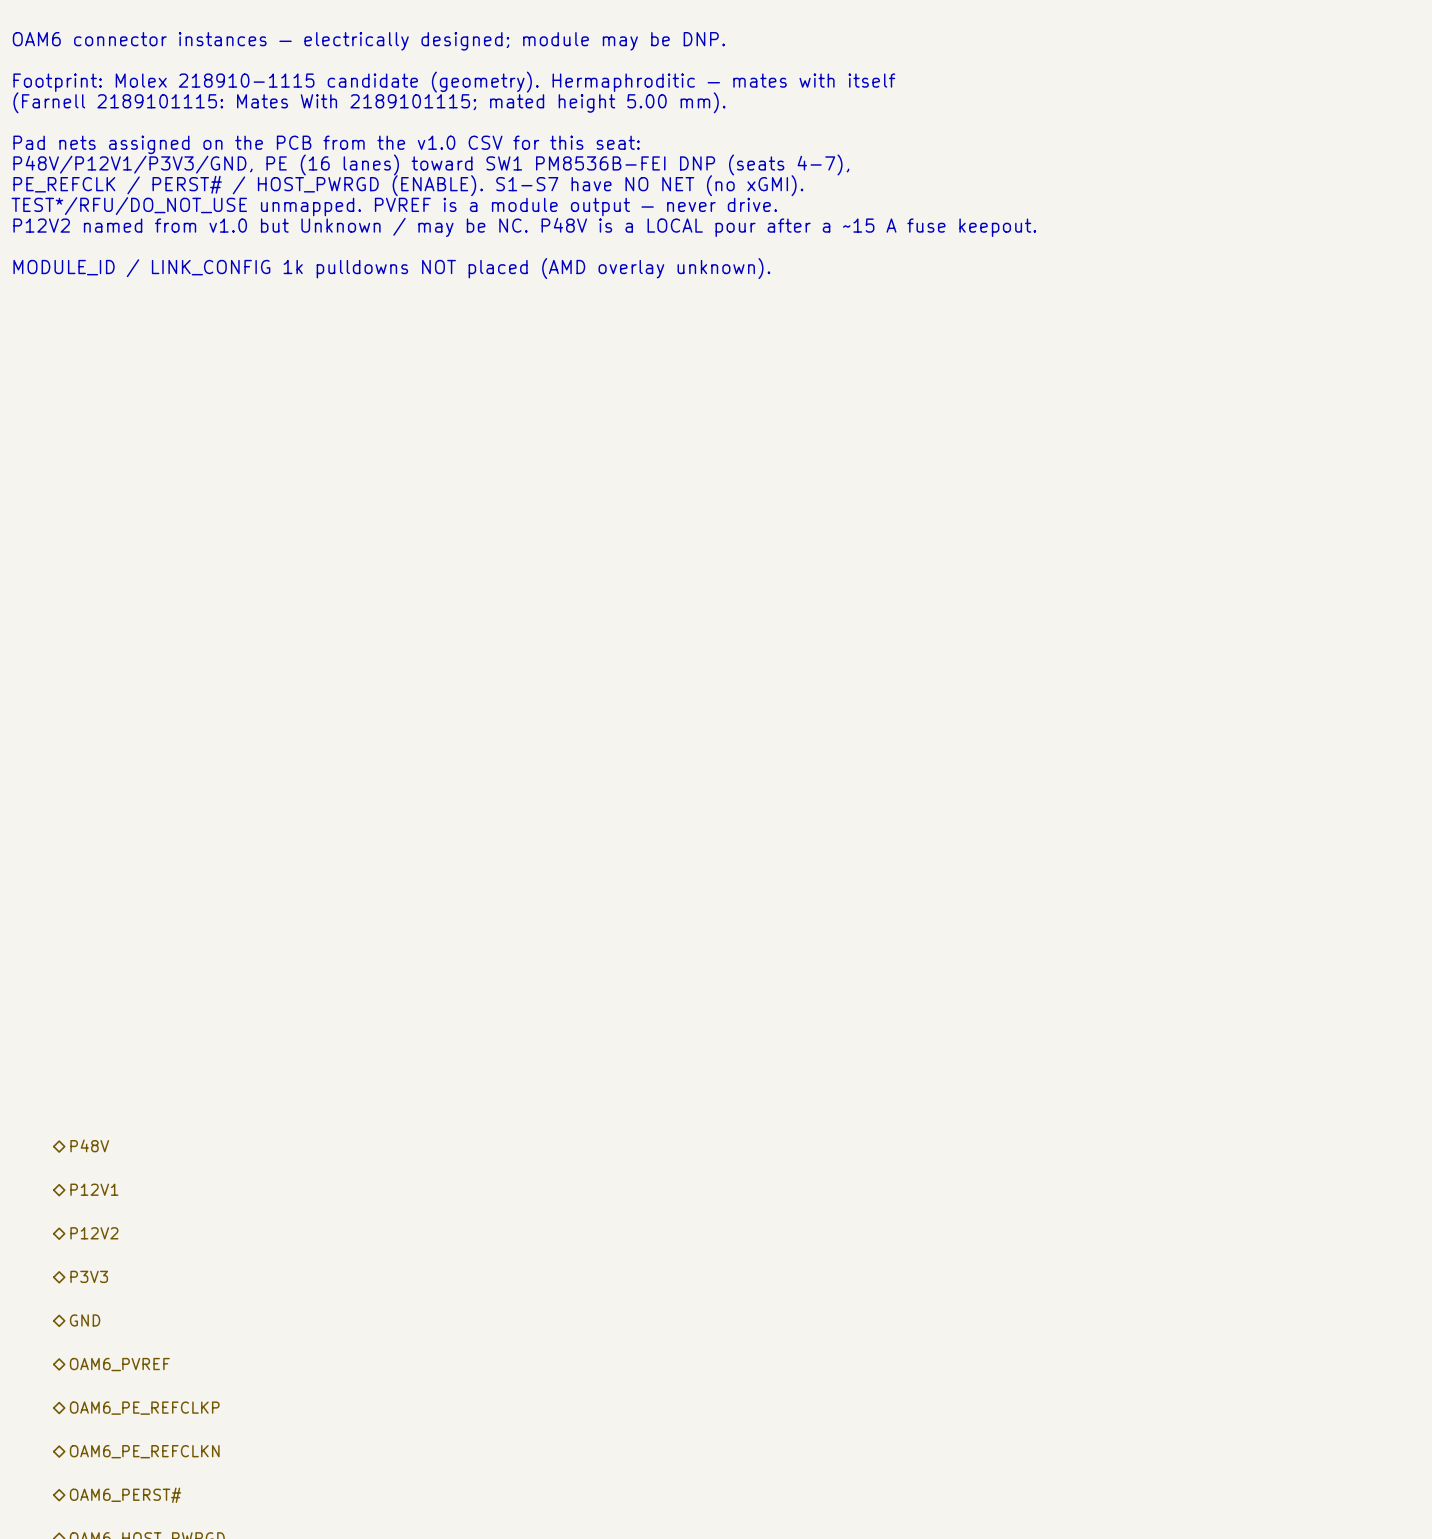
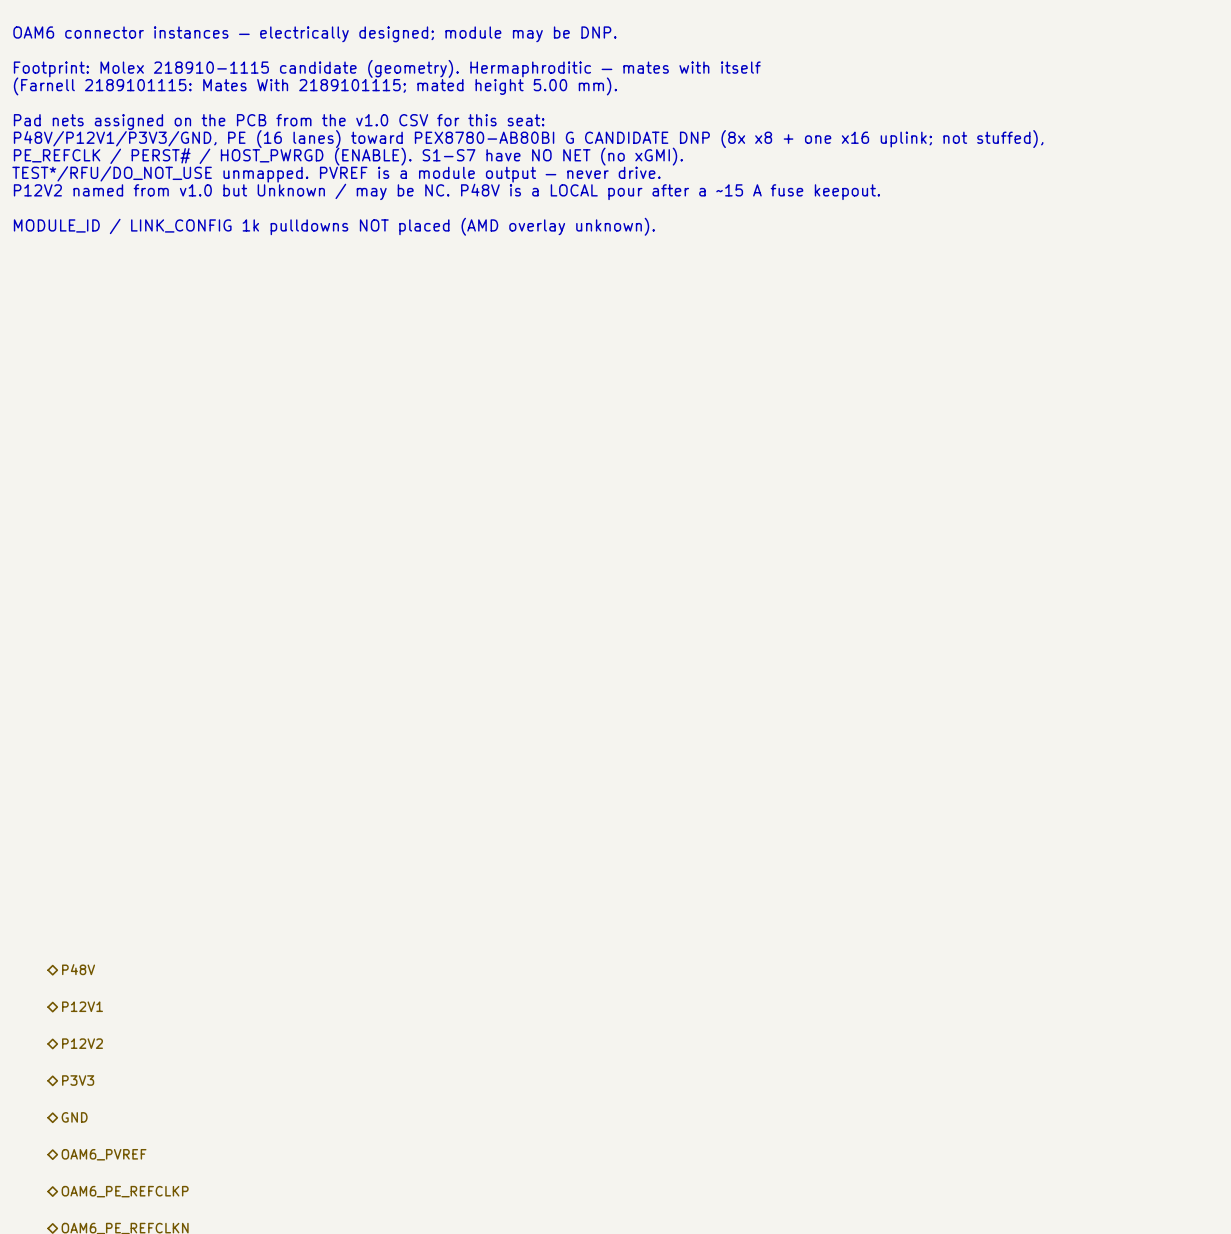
text: P48V/P12V1/P3V3/GND, PE (16 lanes) toward SW1 PM8536B-FEI DNP (seats 4-7), (431, 164) -> P48V/P12V1/P3V3/GND, PE (16 lanes) toward PEX8780-AB80BI G CANDIDATE DNP (8x x8 + one x16 uplink; not stuffed), (528, 139)

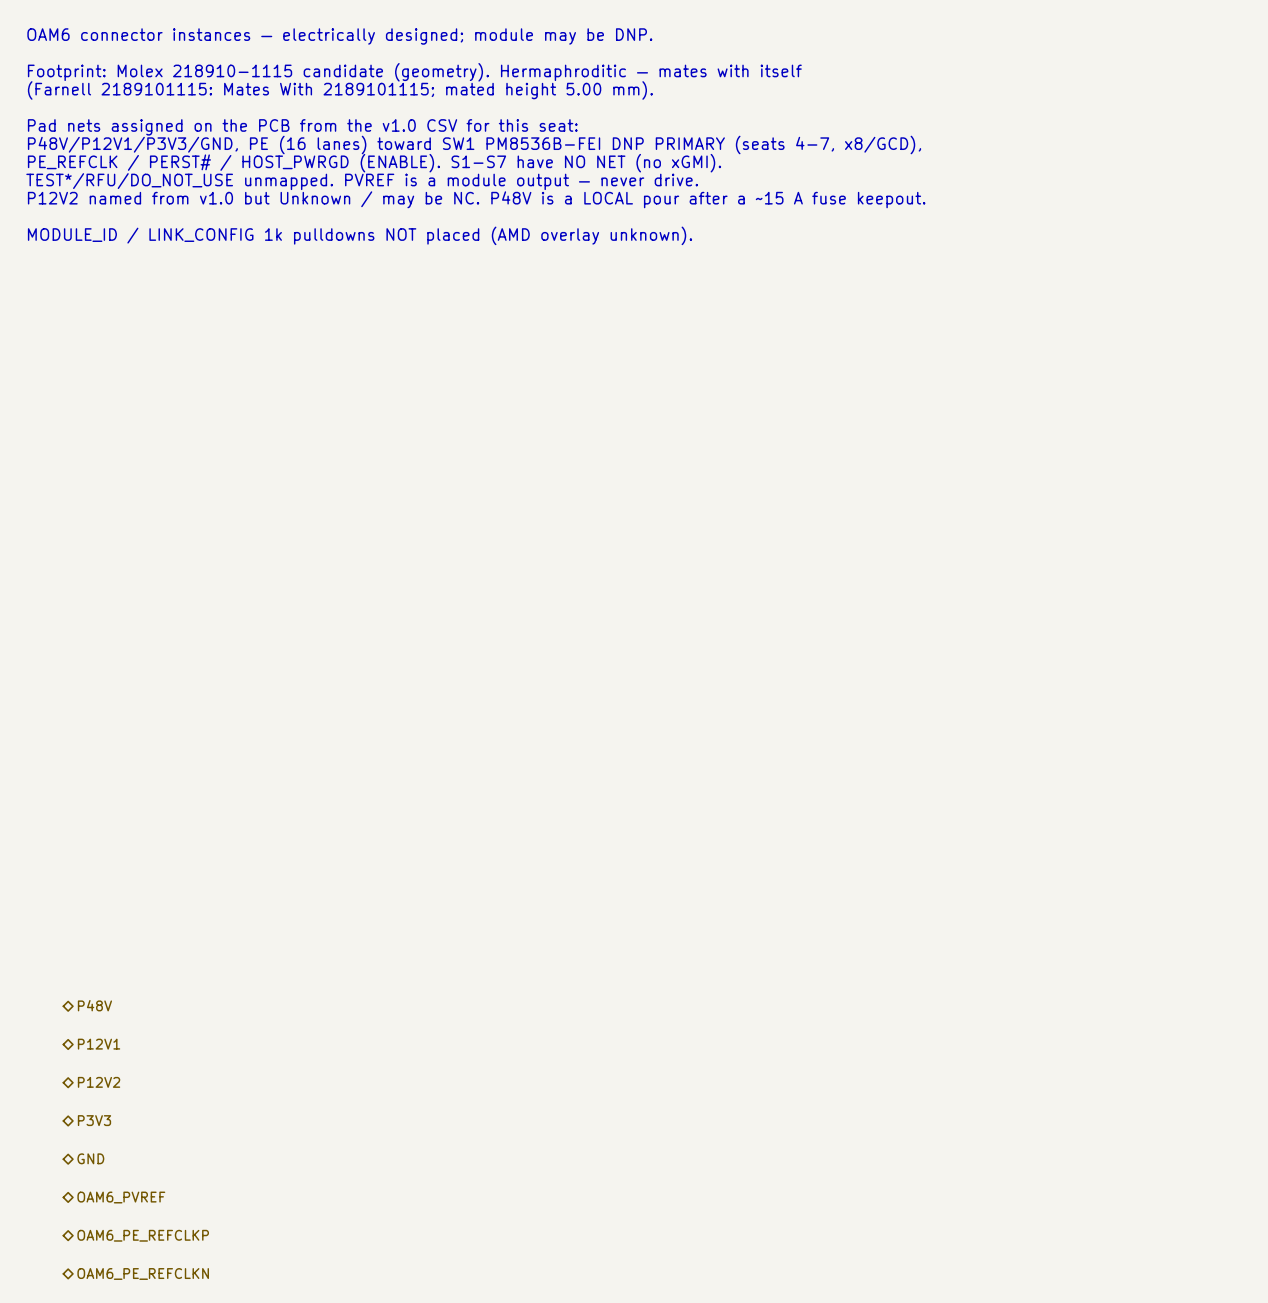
text: P48V/P12V1/P3V3/GND, PE (16 lanes) toward PEX8780-AB80BI G CANDIDATE DNP (8x x8 + one x16 uplink; not stuffed), (528, 139) -> P48V/P12V1/P3V3/GND, PE (16 lanes) toward SW1 PM8536B-FEI DNP PRIMARY (seats 4-7, x8/GCD), (474, 144)

